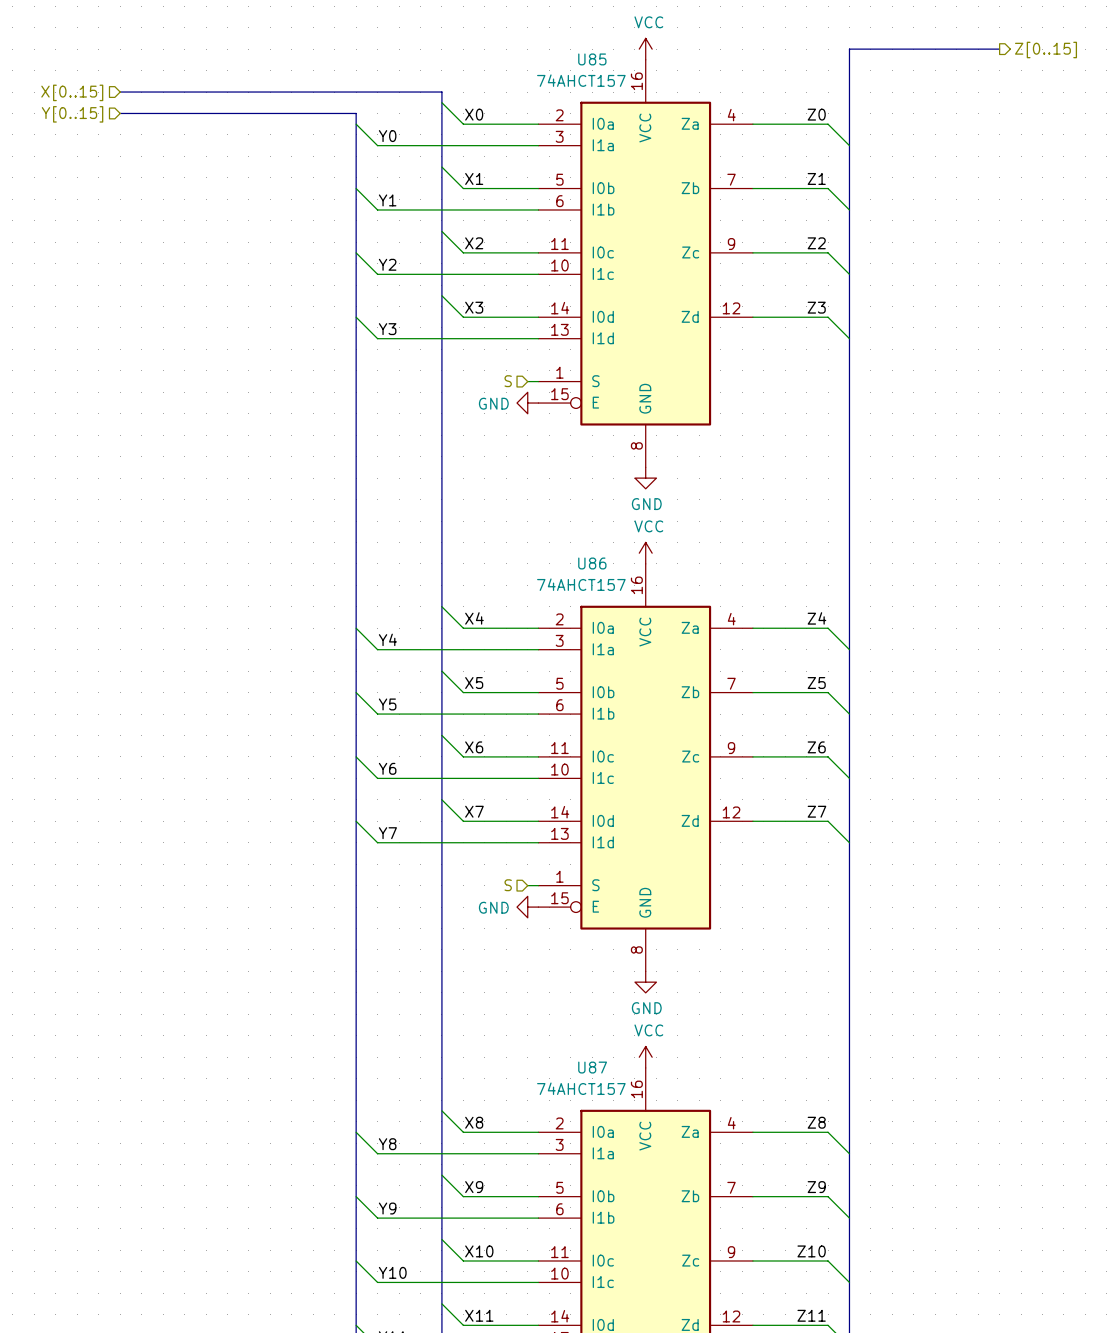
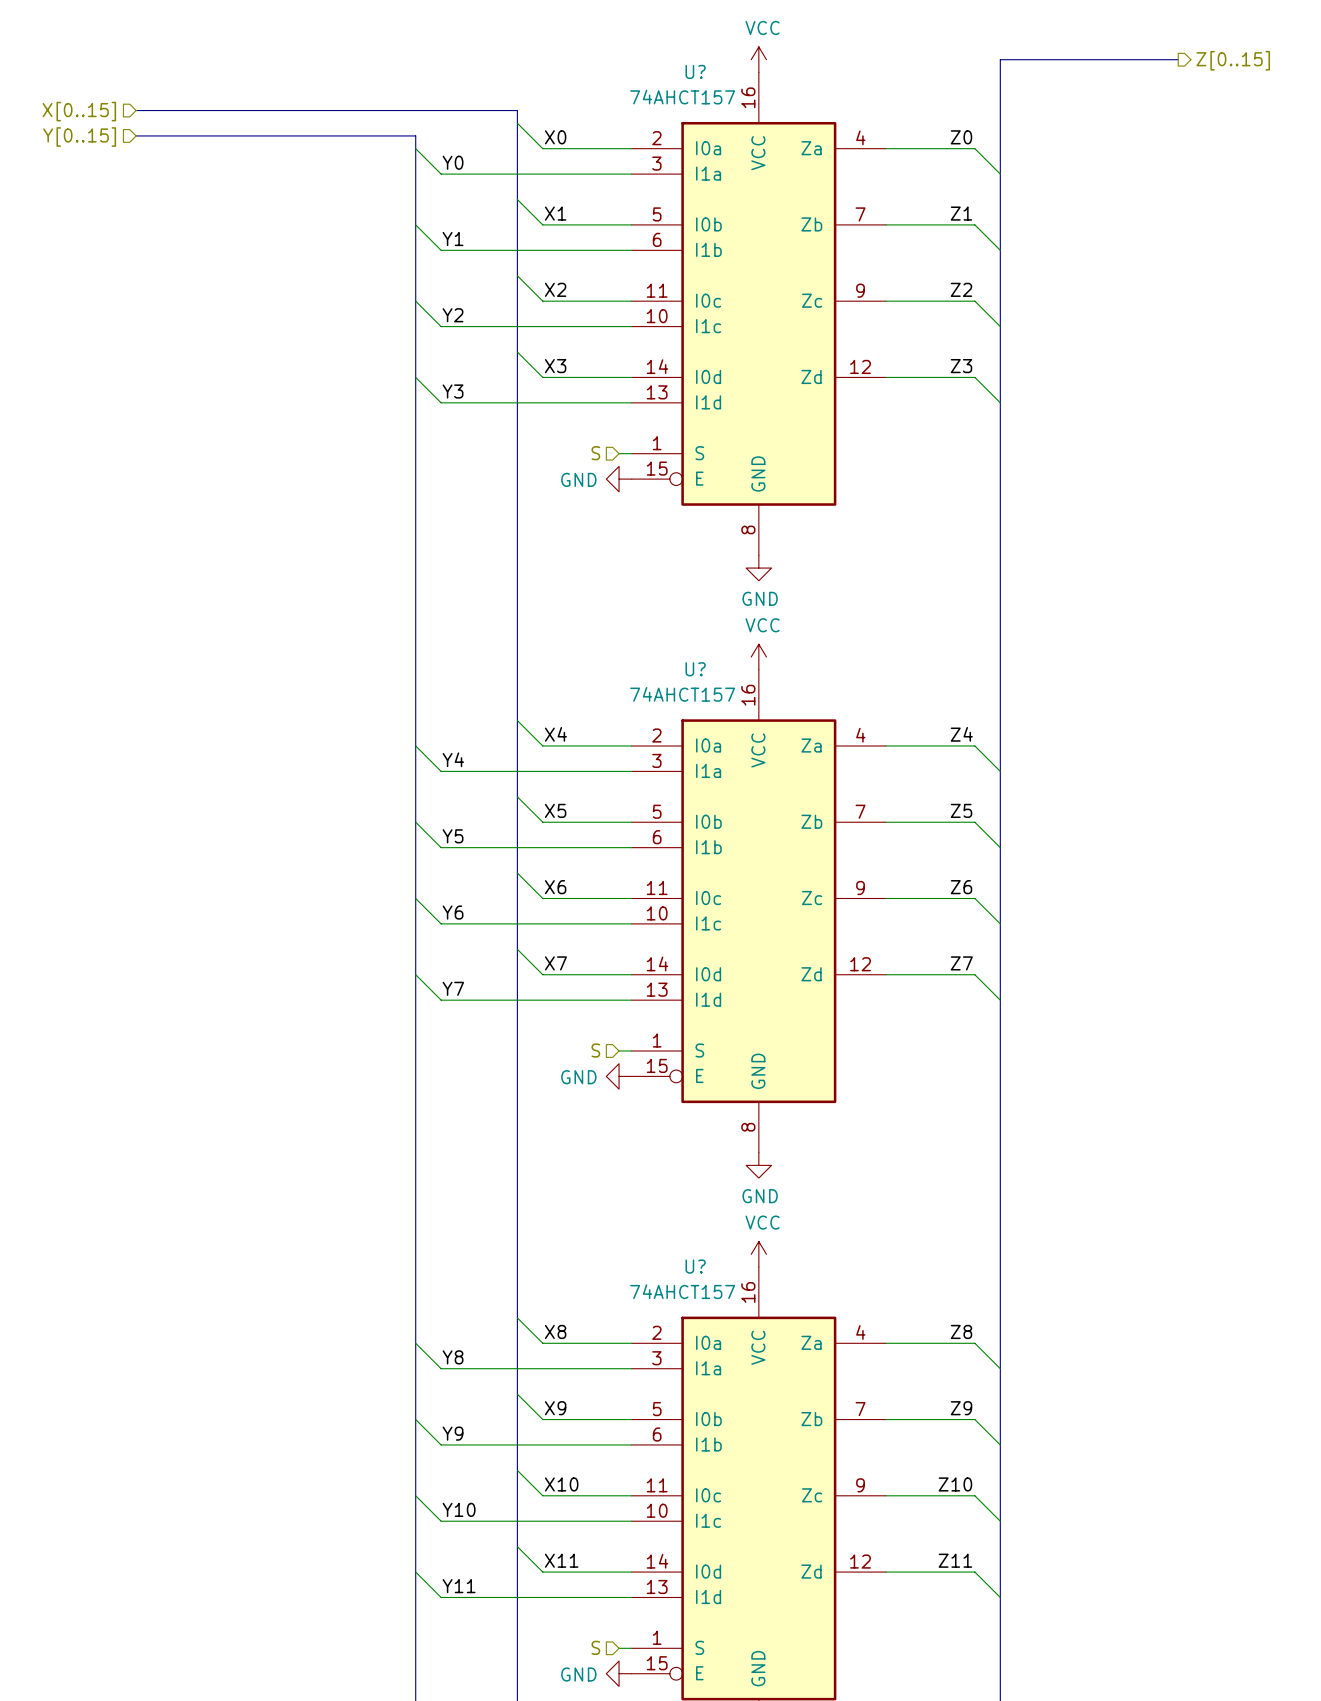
U85 name: U85 (592, 59) -> U? (695, 71)
U86 name: U86 (592, 563) -> U? (695, 669)
U87 name: U87 (592, 1067) -> U? (695, 1266)

